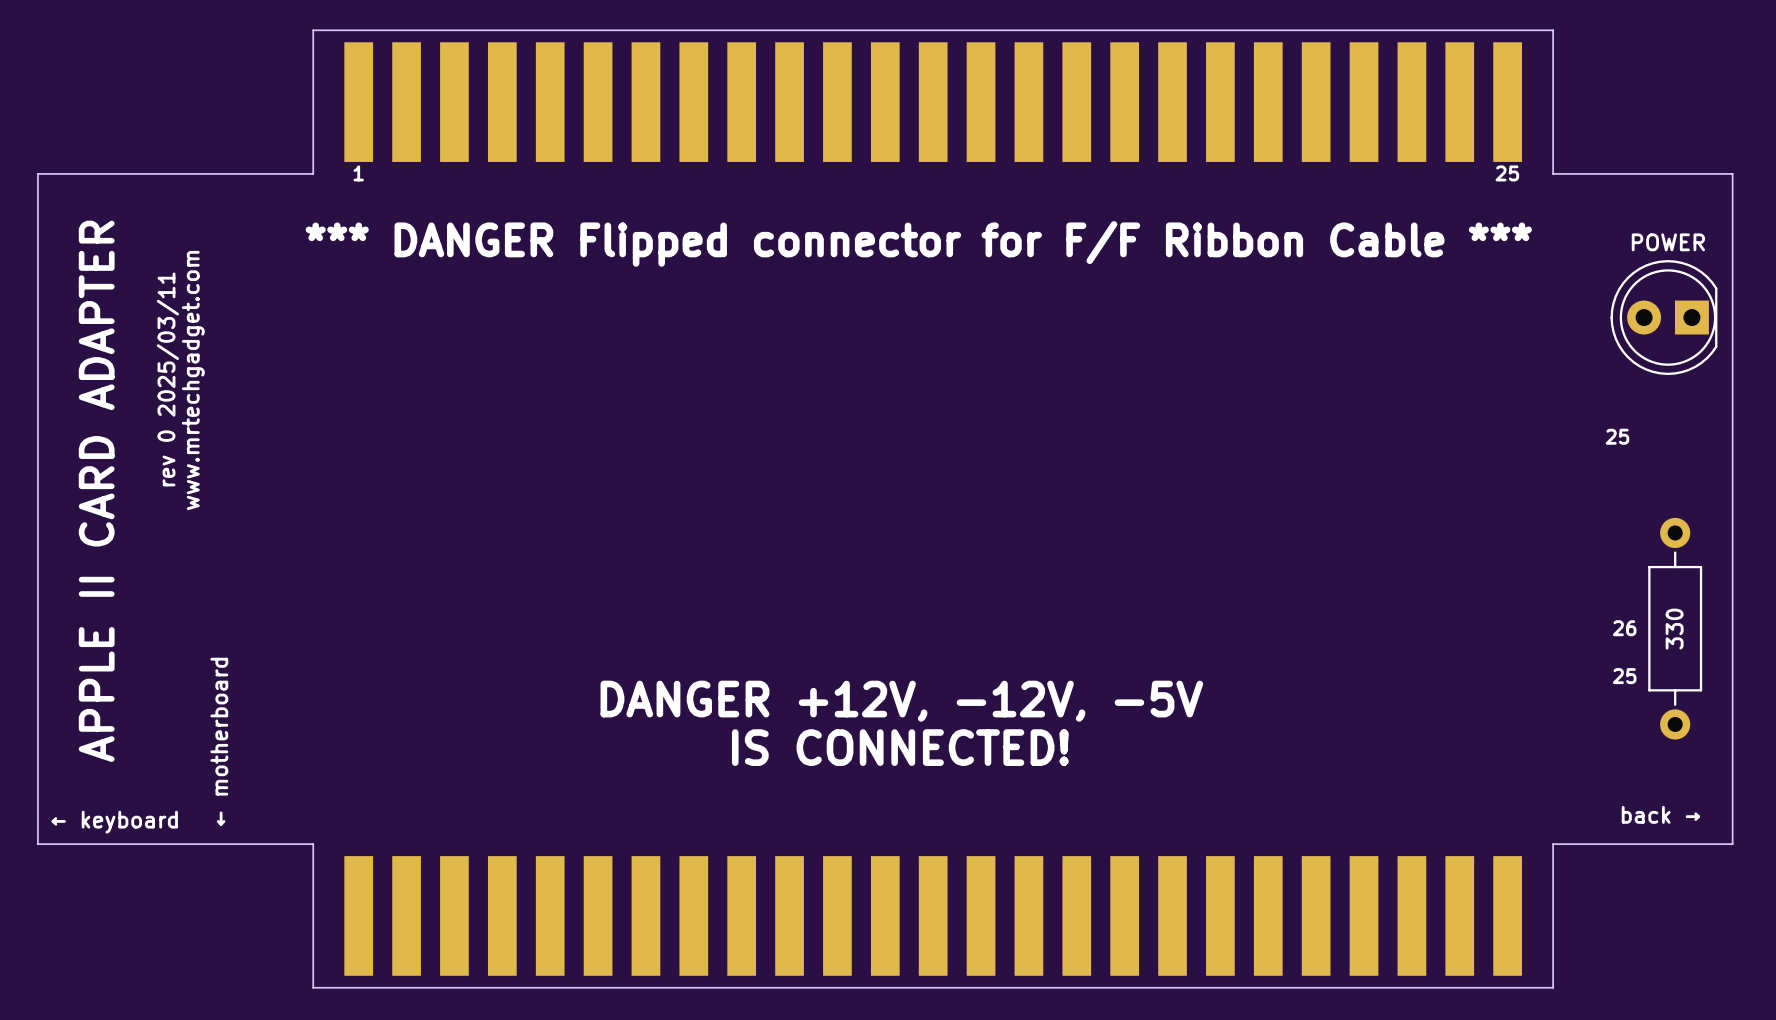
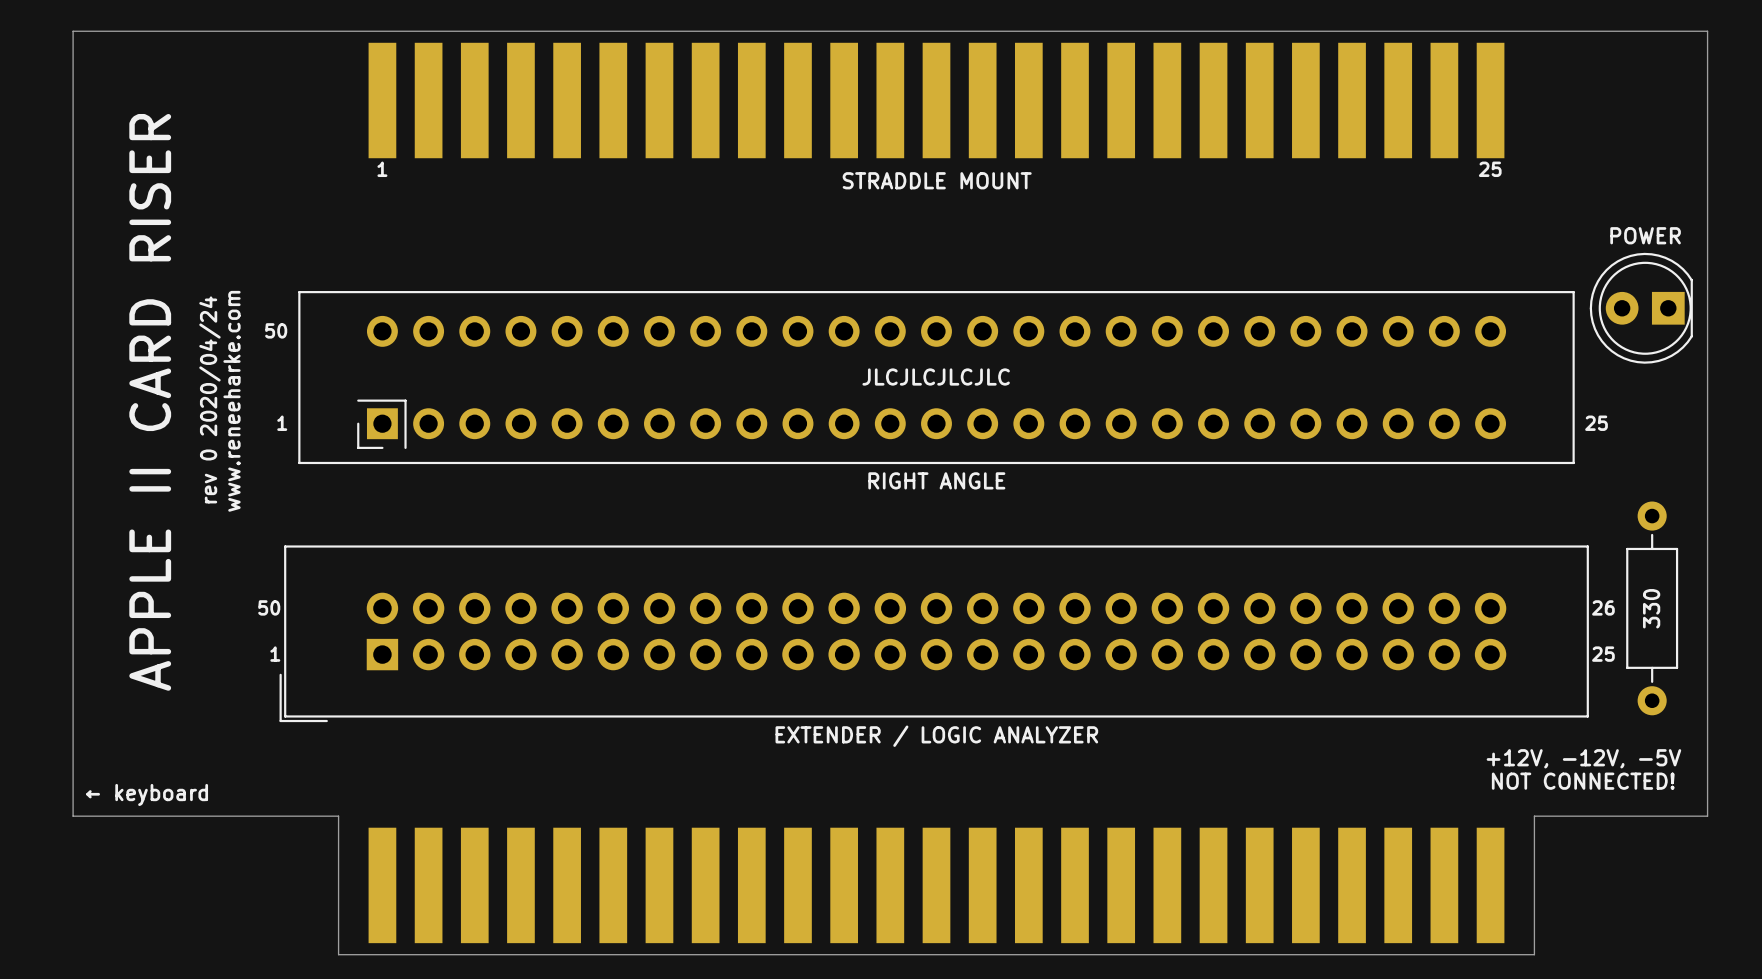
board edge: (313, 30) (313, 173) (37, 173) -> (338, 31) (73, 31) (73, 169)
board edge: (1553, 30) (1553, 173) (1732, 173) -> (1534, 31) (1707, 31) (1707, 169)
part value: *** DANGER Flipped connector for F/F Ribbon Cable *** (918, 243) -> STRADDLE MOUNT (937, 180)
text: none -> 50 (276, 330)
text: rev 0 2025/03/11 (167, 379) -> rev 0 2020/04/24 (209, 399)
text: www.mrtechgadget.com (193, 380) -> www.reneeharke.com (231, 401)
text: none -> JLCJLCJLCJLC (936, 377)
part: none -> RIGHT ANGLE (936, 377)
text: none -> 1 (282, 423)
text: APPLE II CARD ADAPTER (96, 491) -> APPLE II CARD RISER (150, 402)
text: none -> 50 (269, 607)
part: none -> EXTENDER / LOGIC ANALYZER (934, 633)
text: none -> 1 (275, 654)
text: DANGER +12V, -12V, -5V (901, 701) -> none
text: ← motherboard (219, 741) -> none
text: IS CONNECTED! (900, 747) -> none
text: none -> +12V, -12V, -5V (1583, 758)
text: back → (1660, 814) -> NOT CONNECTED! (1583, 781)

